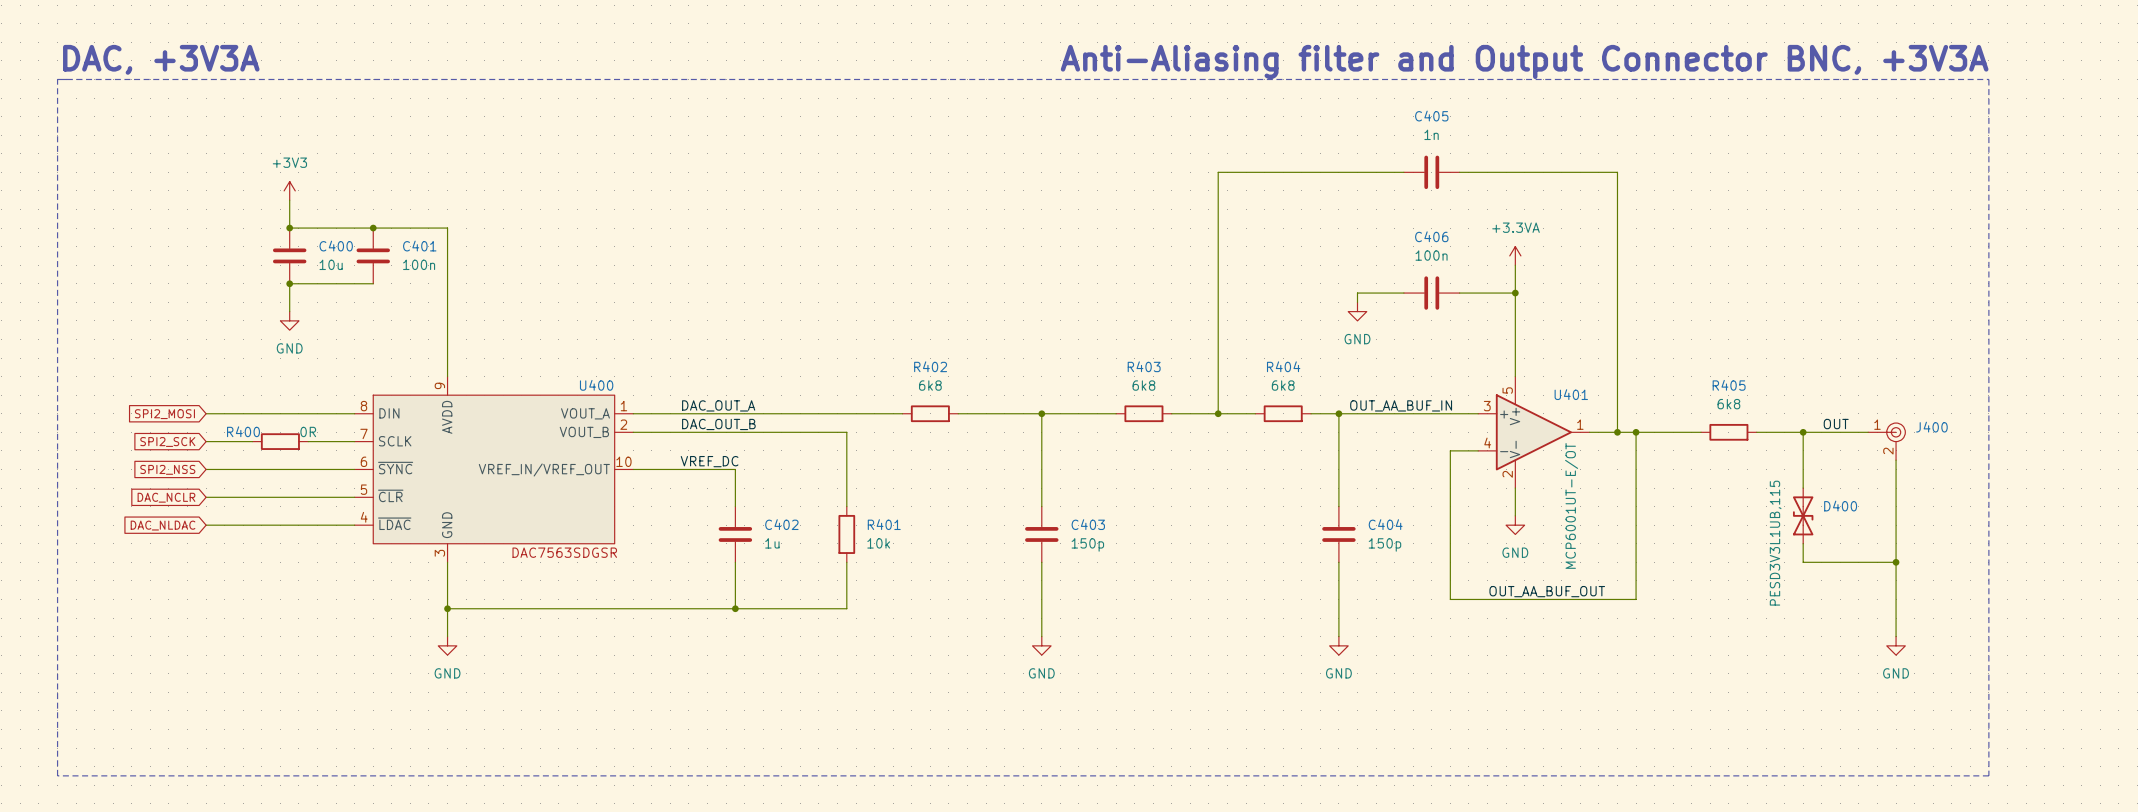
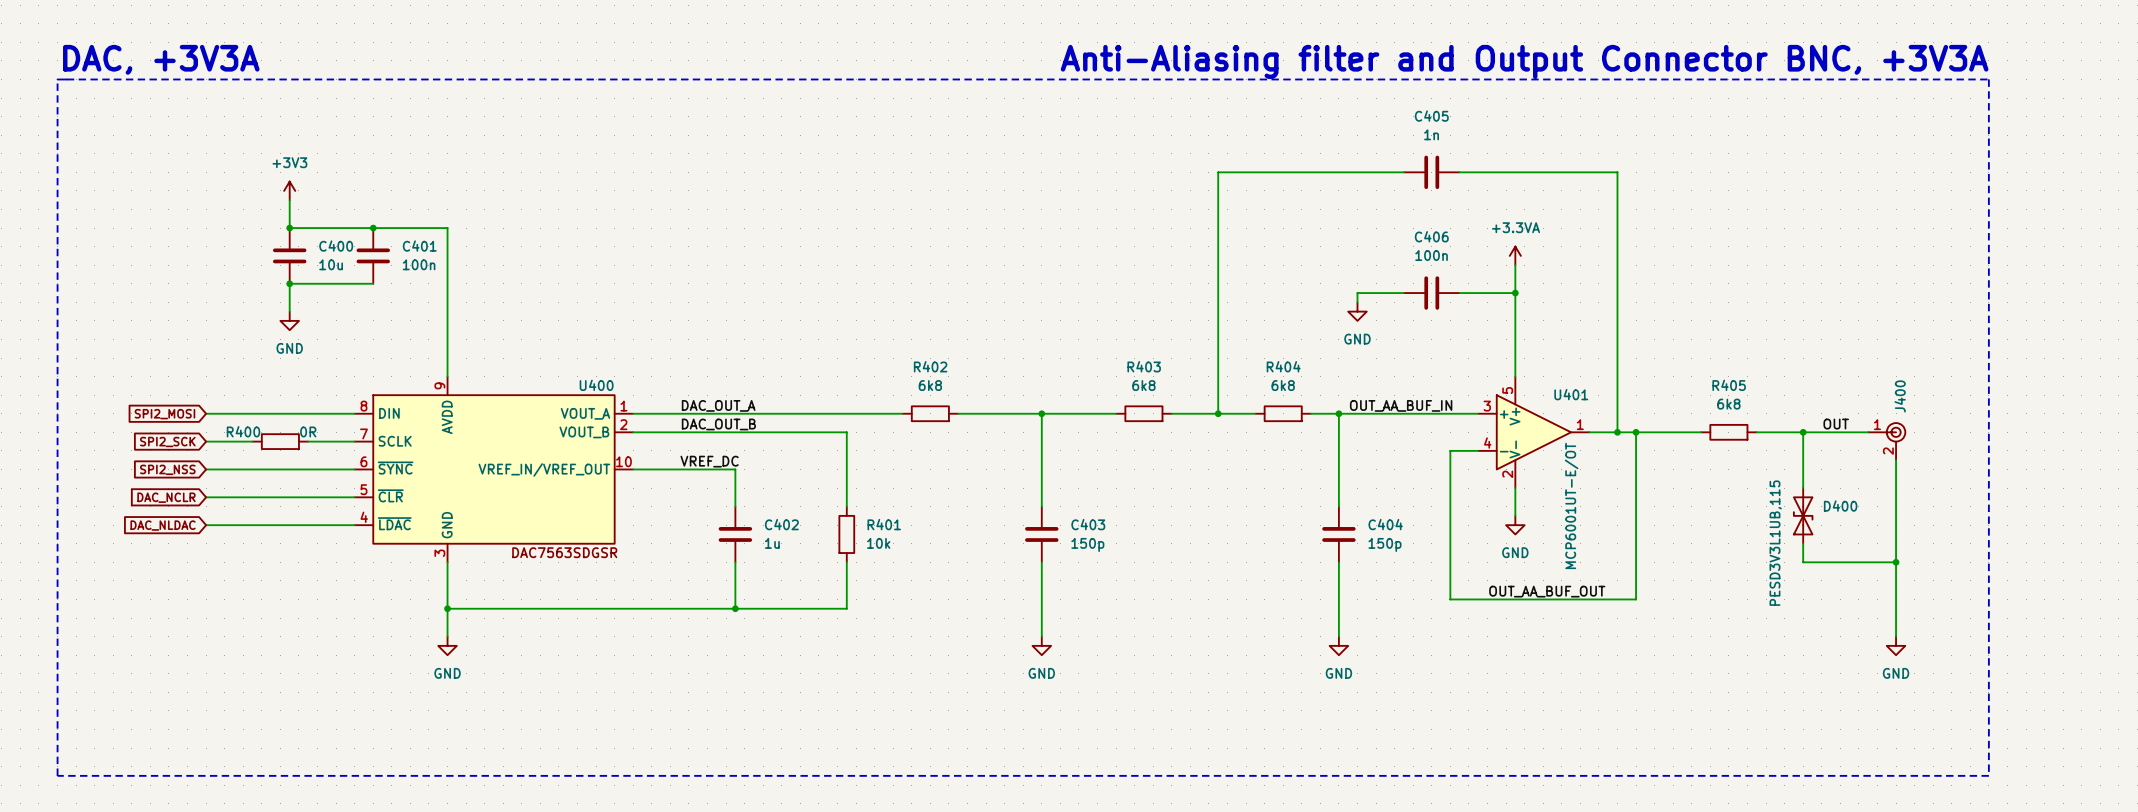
J400 name rotation: 0° (1931, 427) -> 90° counterclockwise (1900, 396)
J400 name position: J400 (1931, 427) -> J400 (1900, 396)

